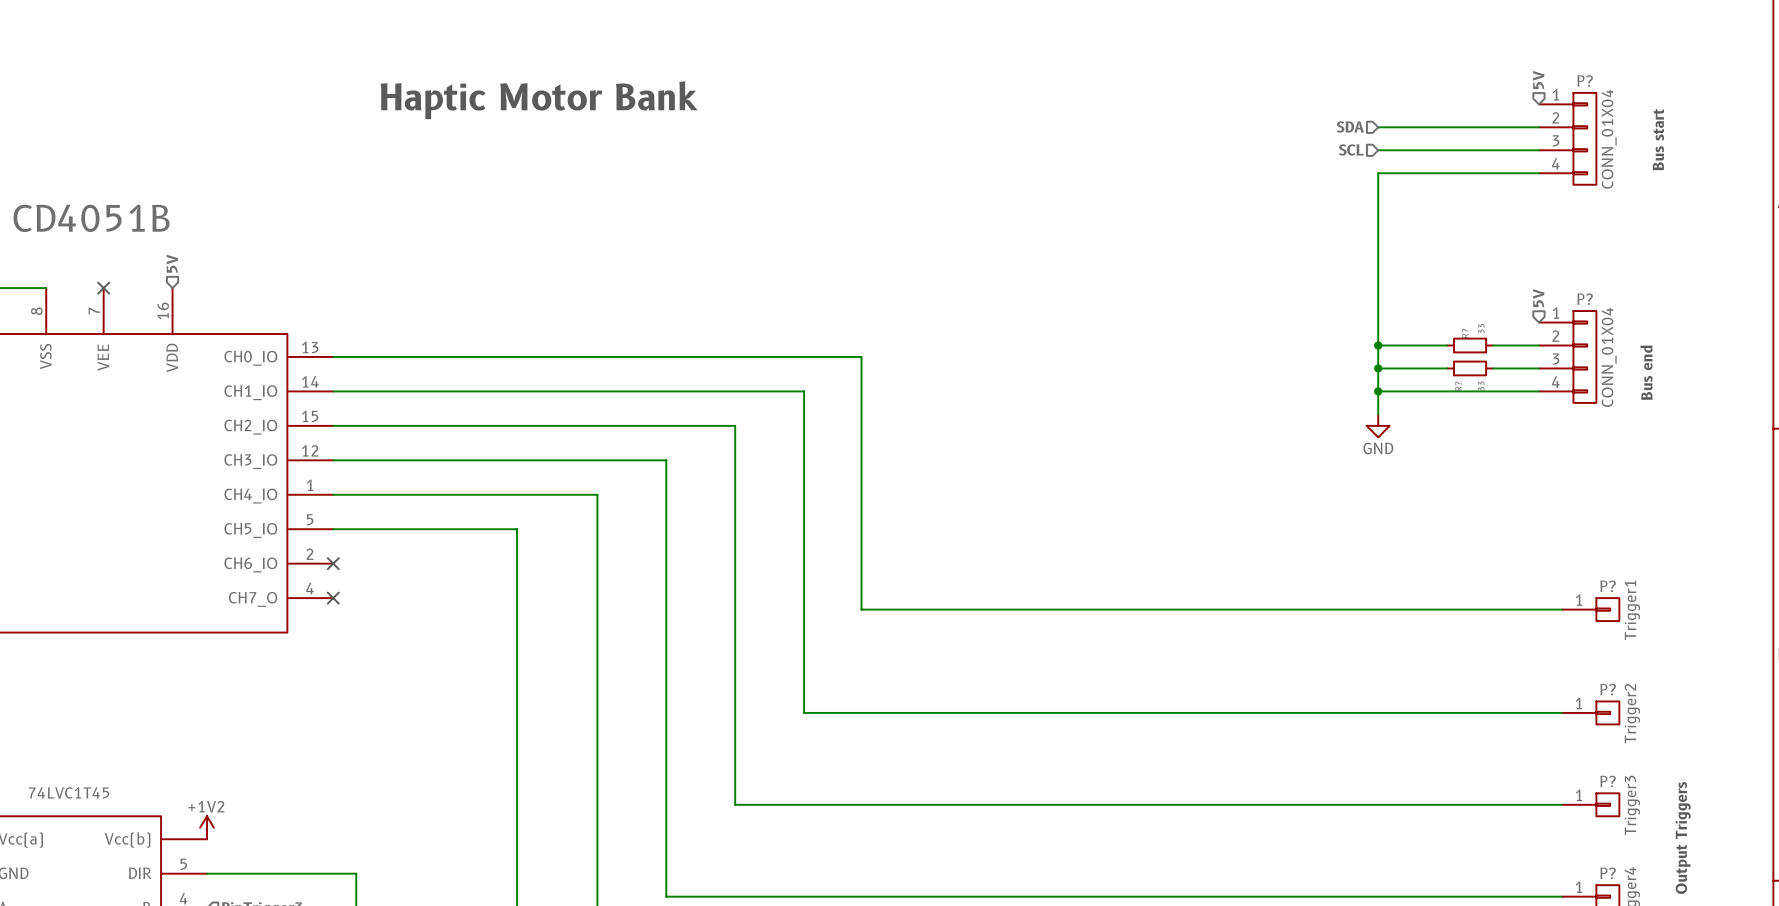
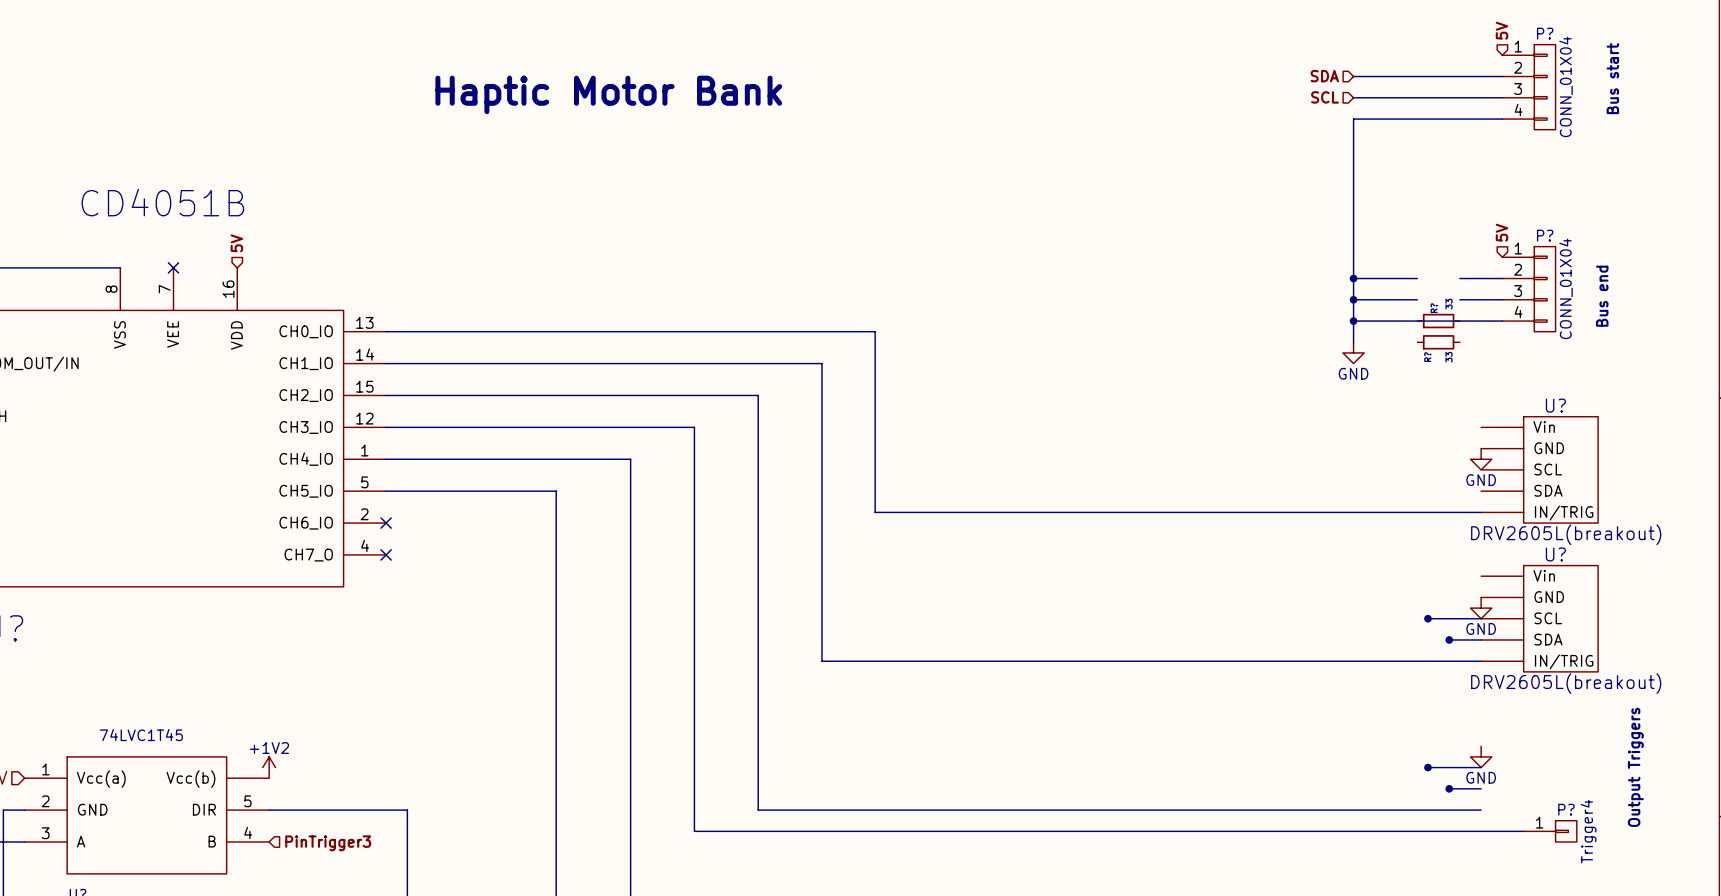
hierarchical label position: 5V (1538, 79) -> 5V (1502, 30)
wire: none -> (1353, 97) (1502, 97)
hierarchical label position: SDA (1350, 126) -> SDA (1324, 76)
P? position: (1567, 138) -> (1528, 87)
text position: Bus start (1658, 139) -> Bus start (1612, 78)
hierarchical label position: SCL (1351, 149) -> SCL (1325, 97)
wire: (1378, 150) (1538, 150) -> (1353, 76) (1502, 76)
wire: (1378, 173) (1538, 173) -> (1353, 161) (1353, 119)
hierarchical label position: 5V (1538, 298) -> 5V (1502, 232)
wire: none -> (1353, 278) (1417, 278)
junction: none -> (1353, 278)
wire: none -> (1353, 299) (1417, 299)
junction: none -> (1353, 299)
wire: none -> (1459, 299) (1502, 299)
wire: none -> (1417, 321) (1459, 321)
P? position: (1567, 356) -> (1528, 289)
junction: (1378, 368) -> none
wire: (1447, 368) (1378, 368) (1378, 414) -> none
wire: (1493, 368) (1538, 368) -> (1459, 278) (1502, 278)
text position: Bus end (1646, 372) -> Bus end (1602, 296)
wire: (1378, 391) (1538, 391) -> none
junction: (1378, 391) -> none
power symbol position: GND (1378, 425) -> GND (1353, 352)
power symbol: none -> GND (1481, 459)
U?: none -> DRV2605L(breakout) (1539, 469)
wire: (861, 552) (861, 609) (1561, 609) -> (875, 512) (1481, 512)
P?: Trigger1 (1590, 609) -> none
power symbol: none -> GND (1481, 608)
wire: none -> (1427, 618) (1481, 618)
junction: none -> (1427, 618)
U?: none -> DRV2605L(breakout) (1539, 618)
wire: none -> (1449, 639) (1481, 639)
junction: none -> (1449, 639)
P?: Trigger2 (1590, 712) -> none
wire: (735, 804) (1561, 804) -> (758, 746) (758, 810) (1481, 810)
P?: Trigger3 (1590, 804) -> none
power symbol: none -> GND (1481, 756)
wire: none -> (1427, 767) (1481, 767)
junction: none -> (1427, 767)
wire: none -> (1449, 788) (1481, 788)
junction: none -> (1449, 788)

